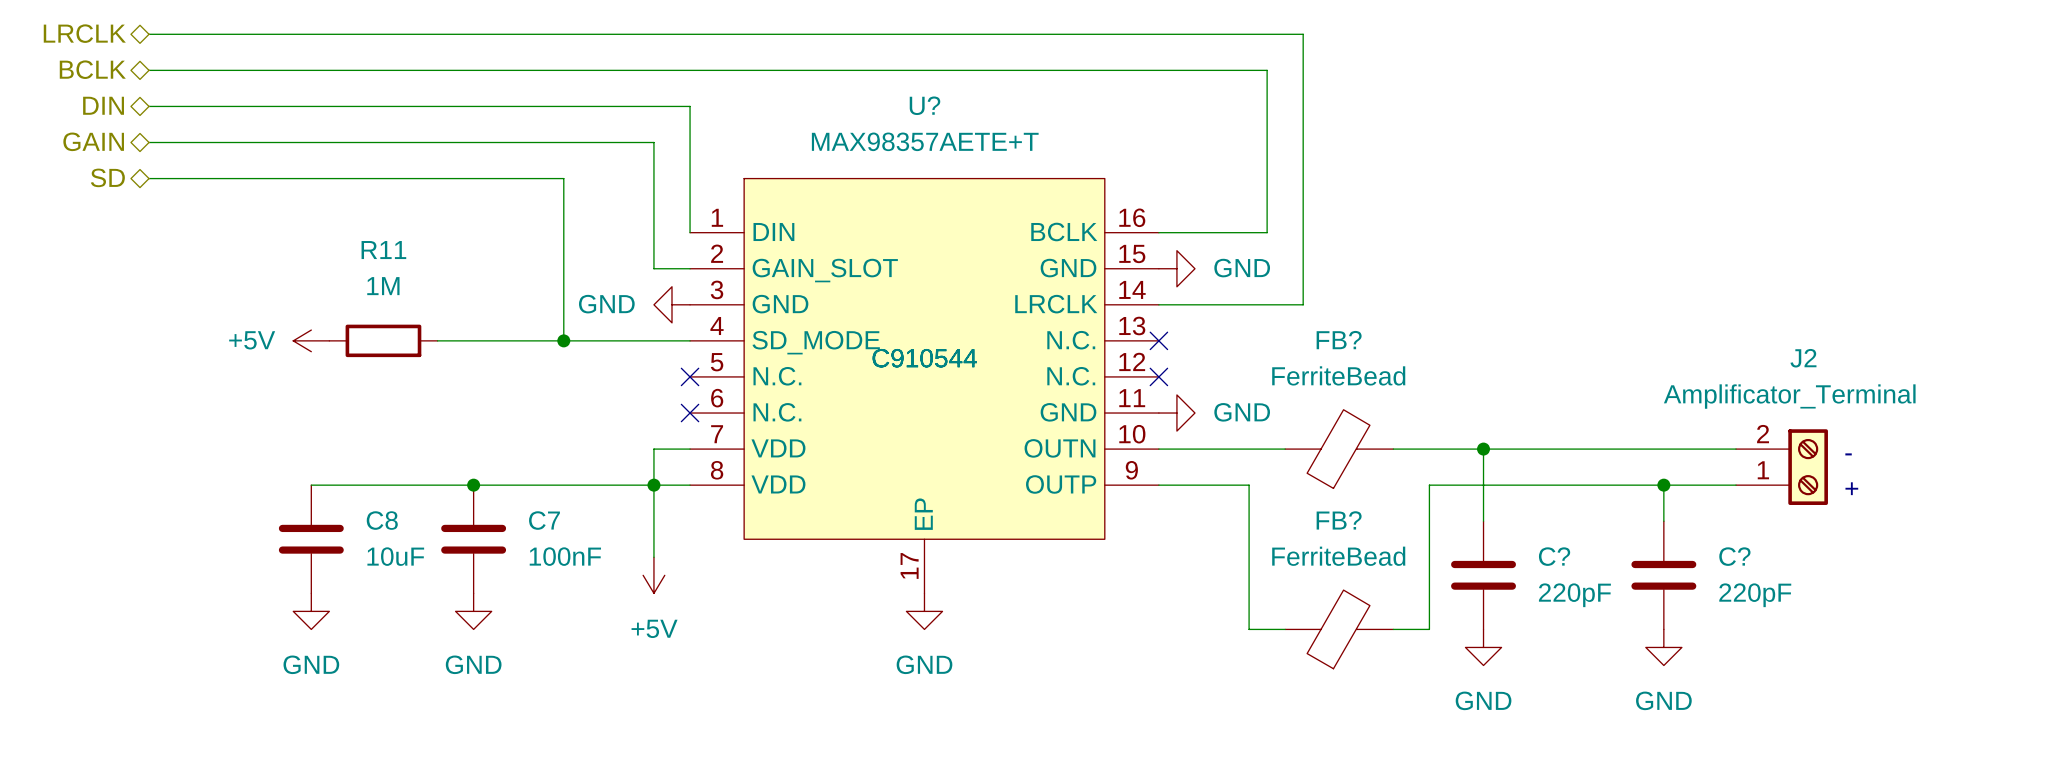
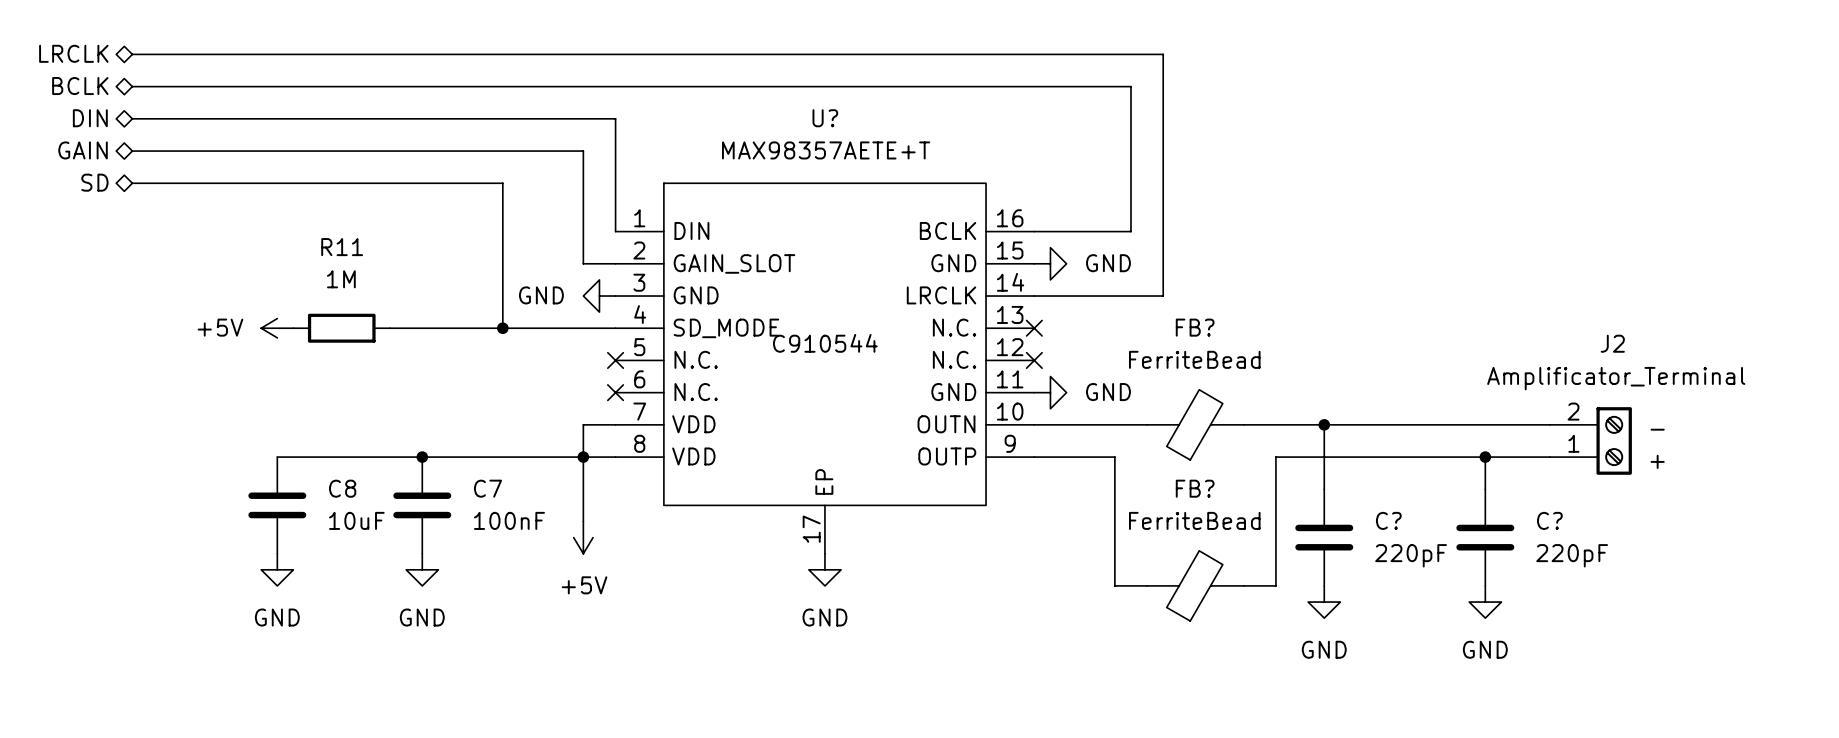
U? text: C910544 (924, 358) -> none

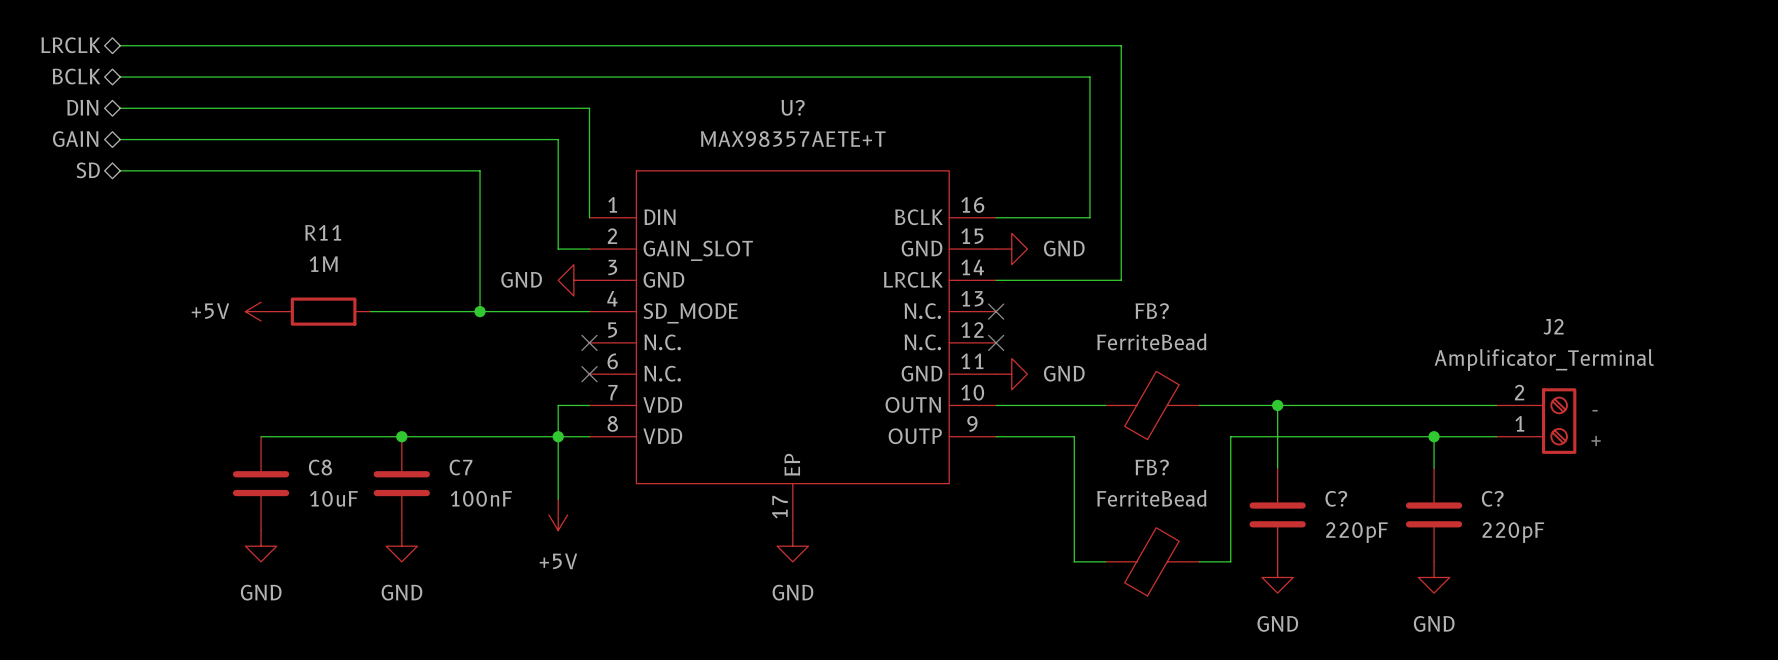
U? text: C910544 (825, 343) -> none

